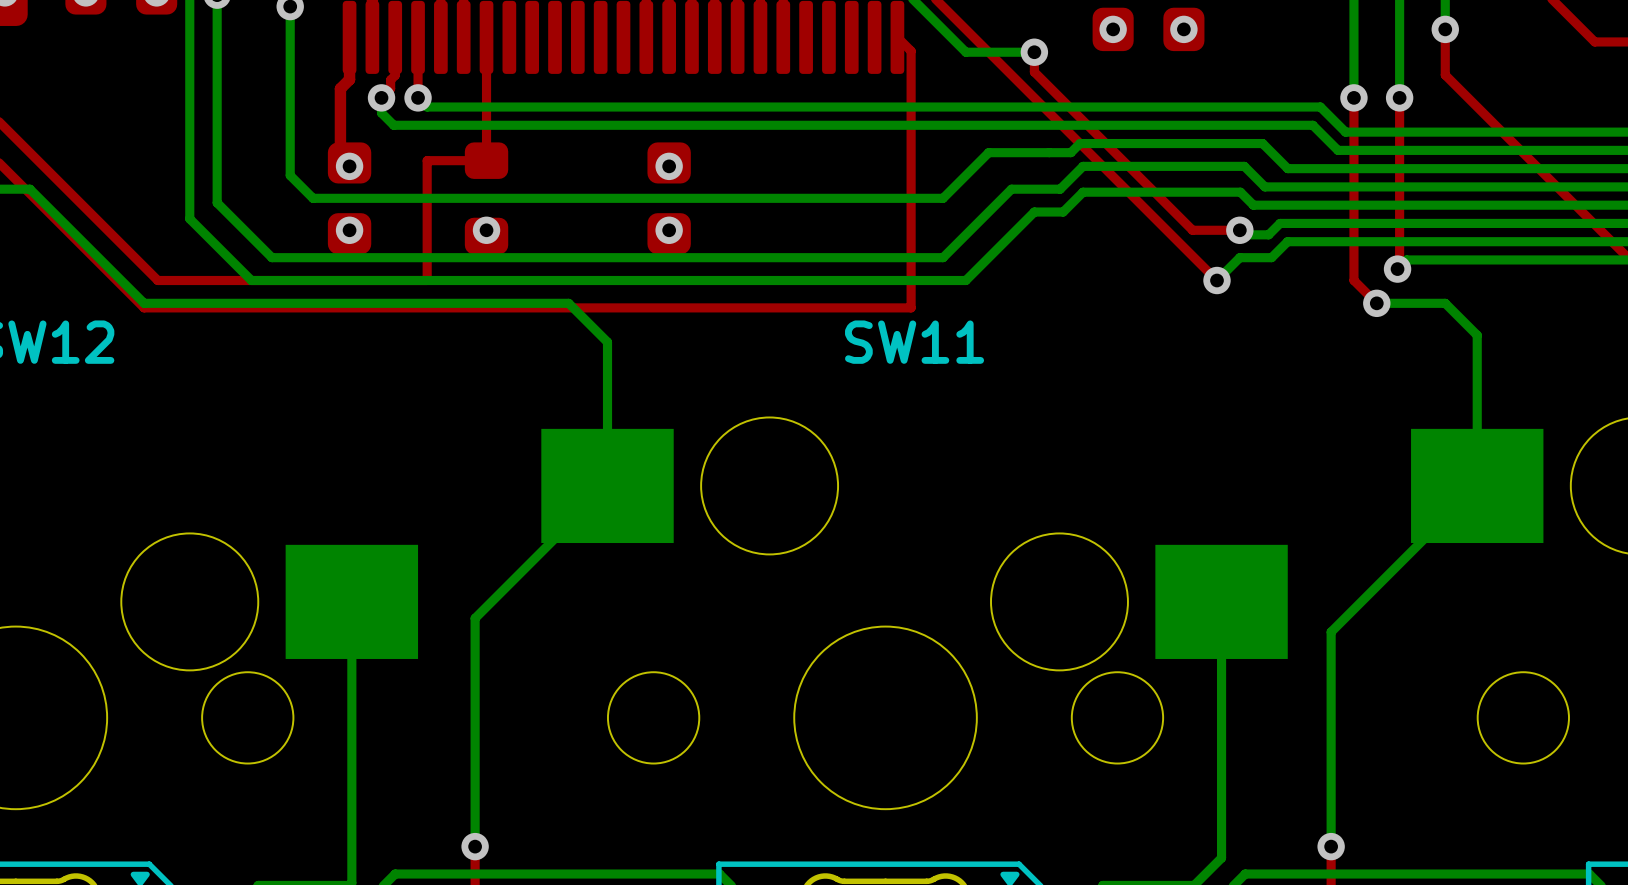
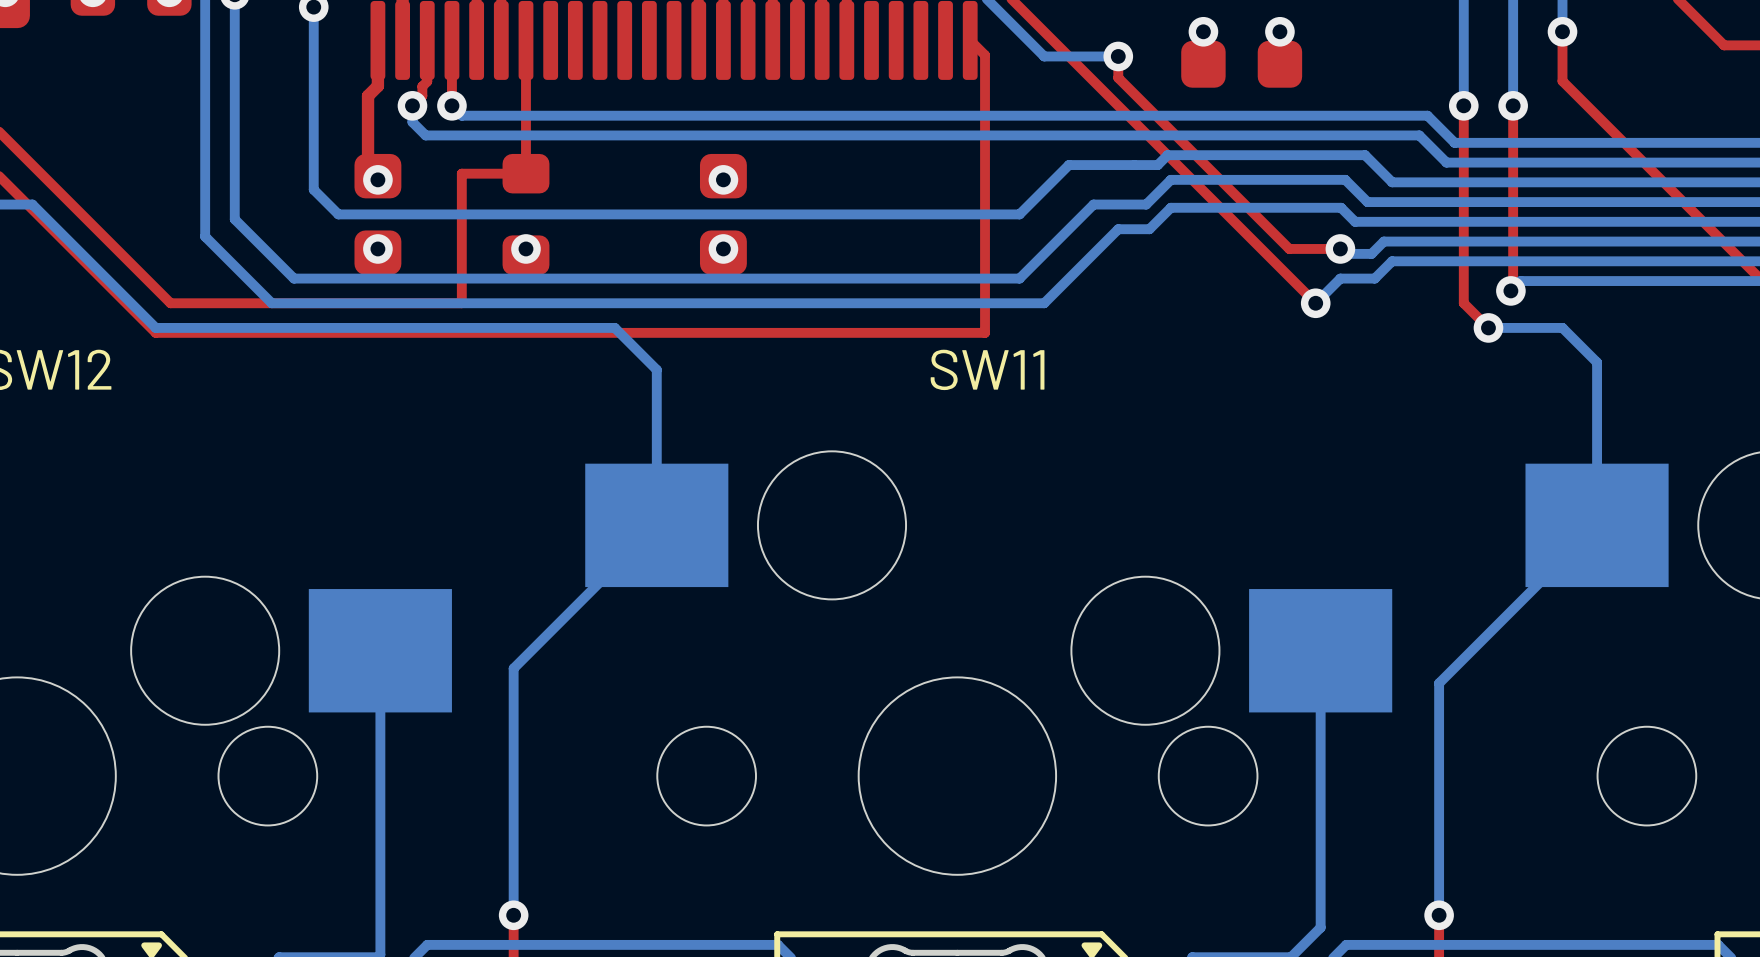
part: (1148, 29) -> none
part: none -> (1241, 64)

